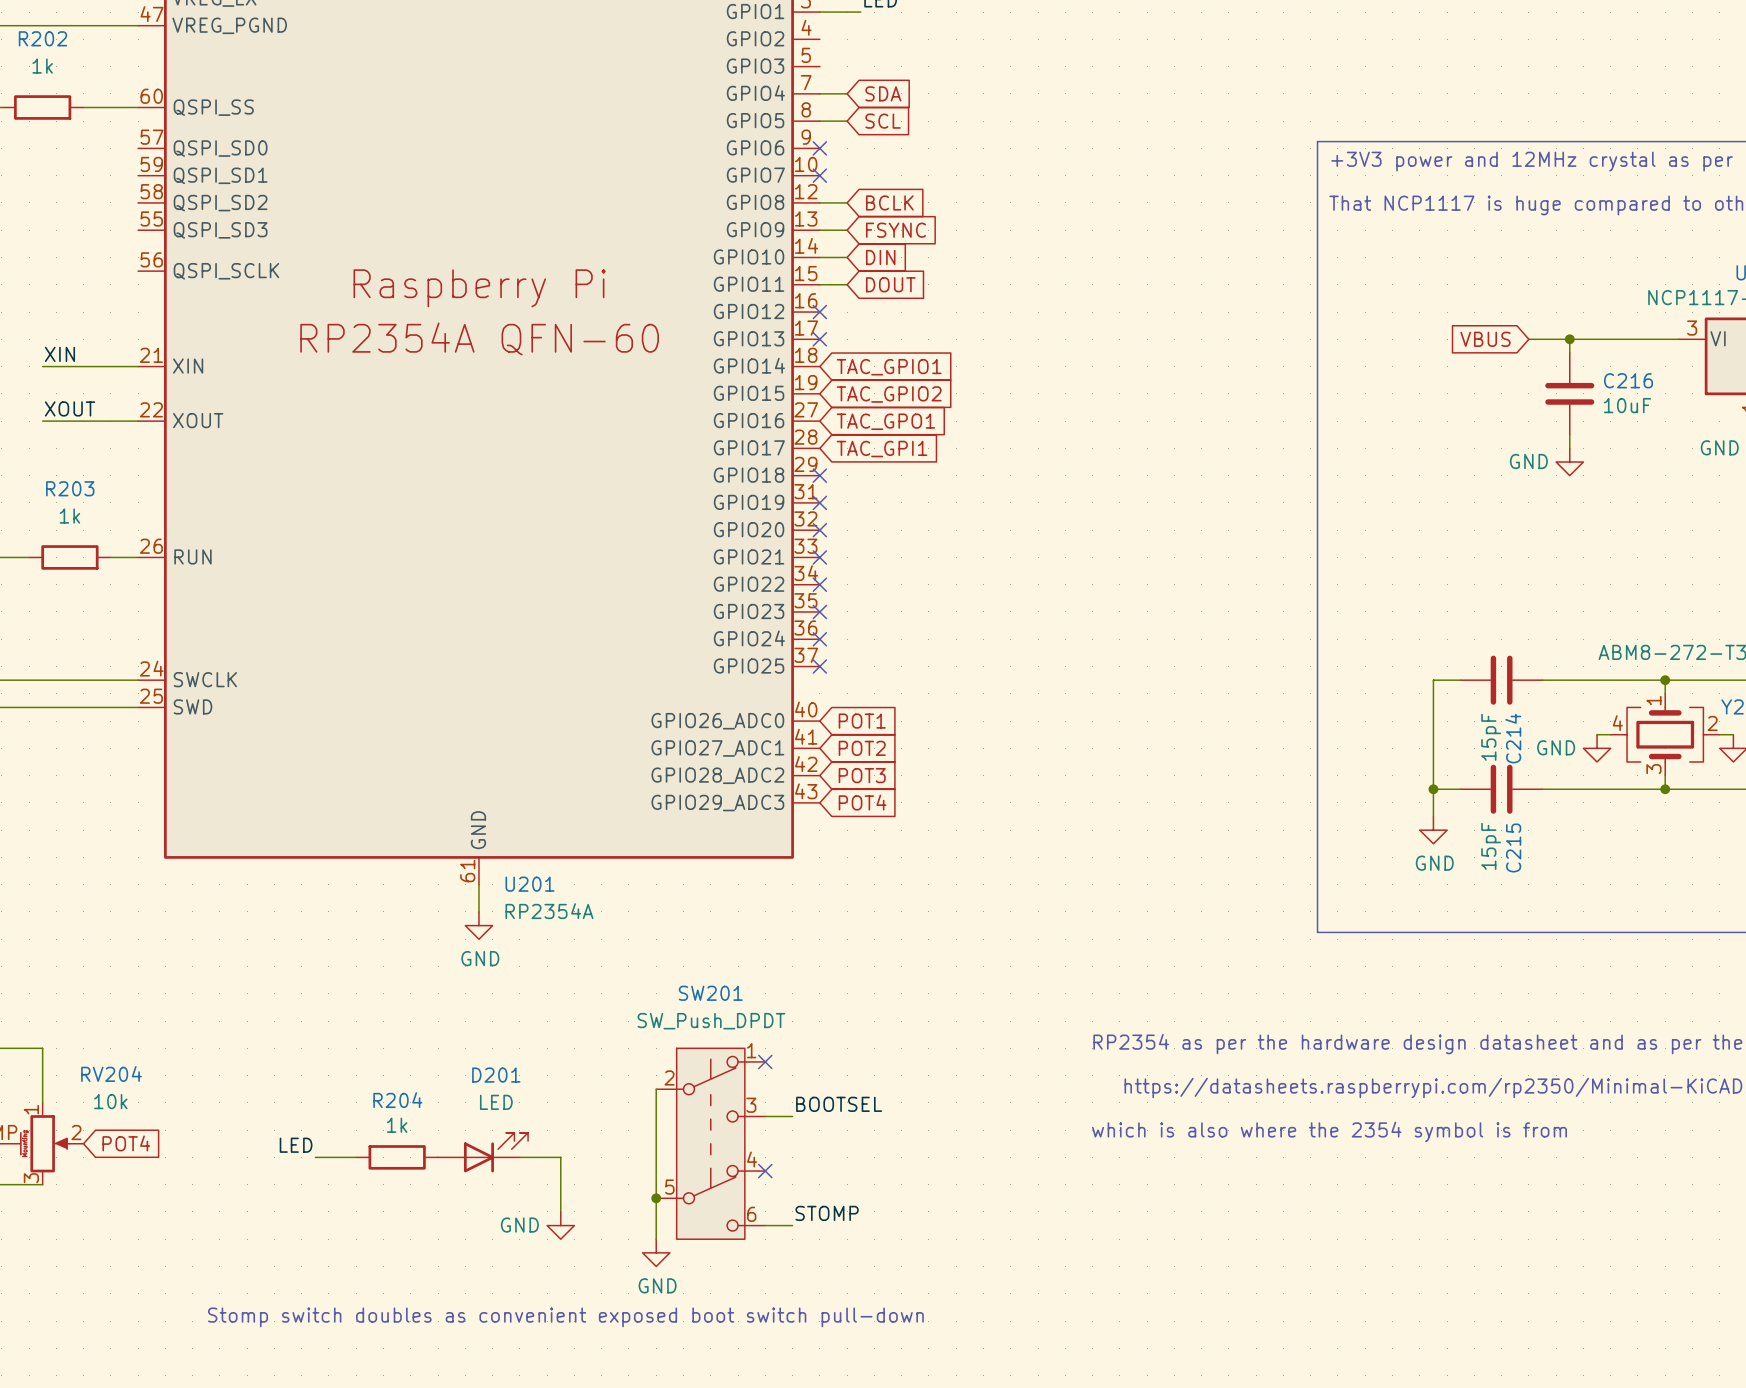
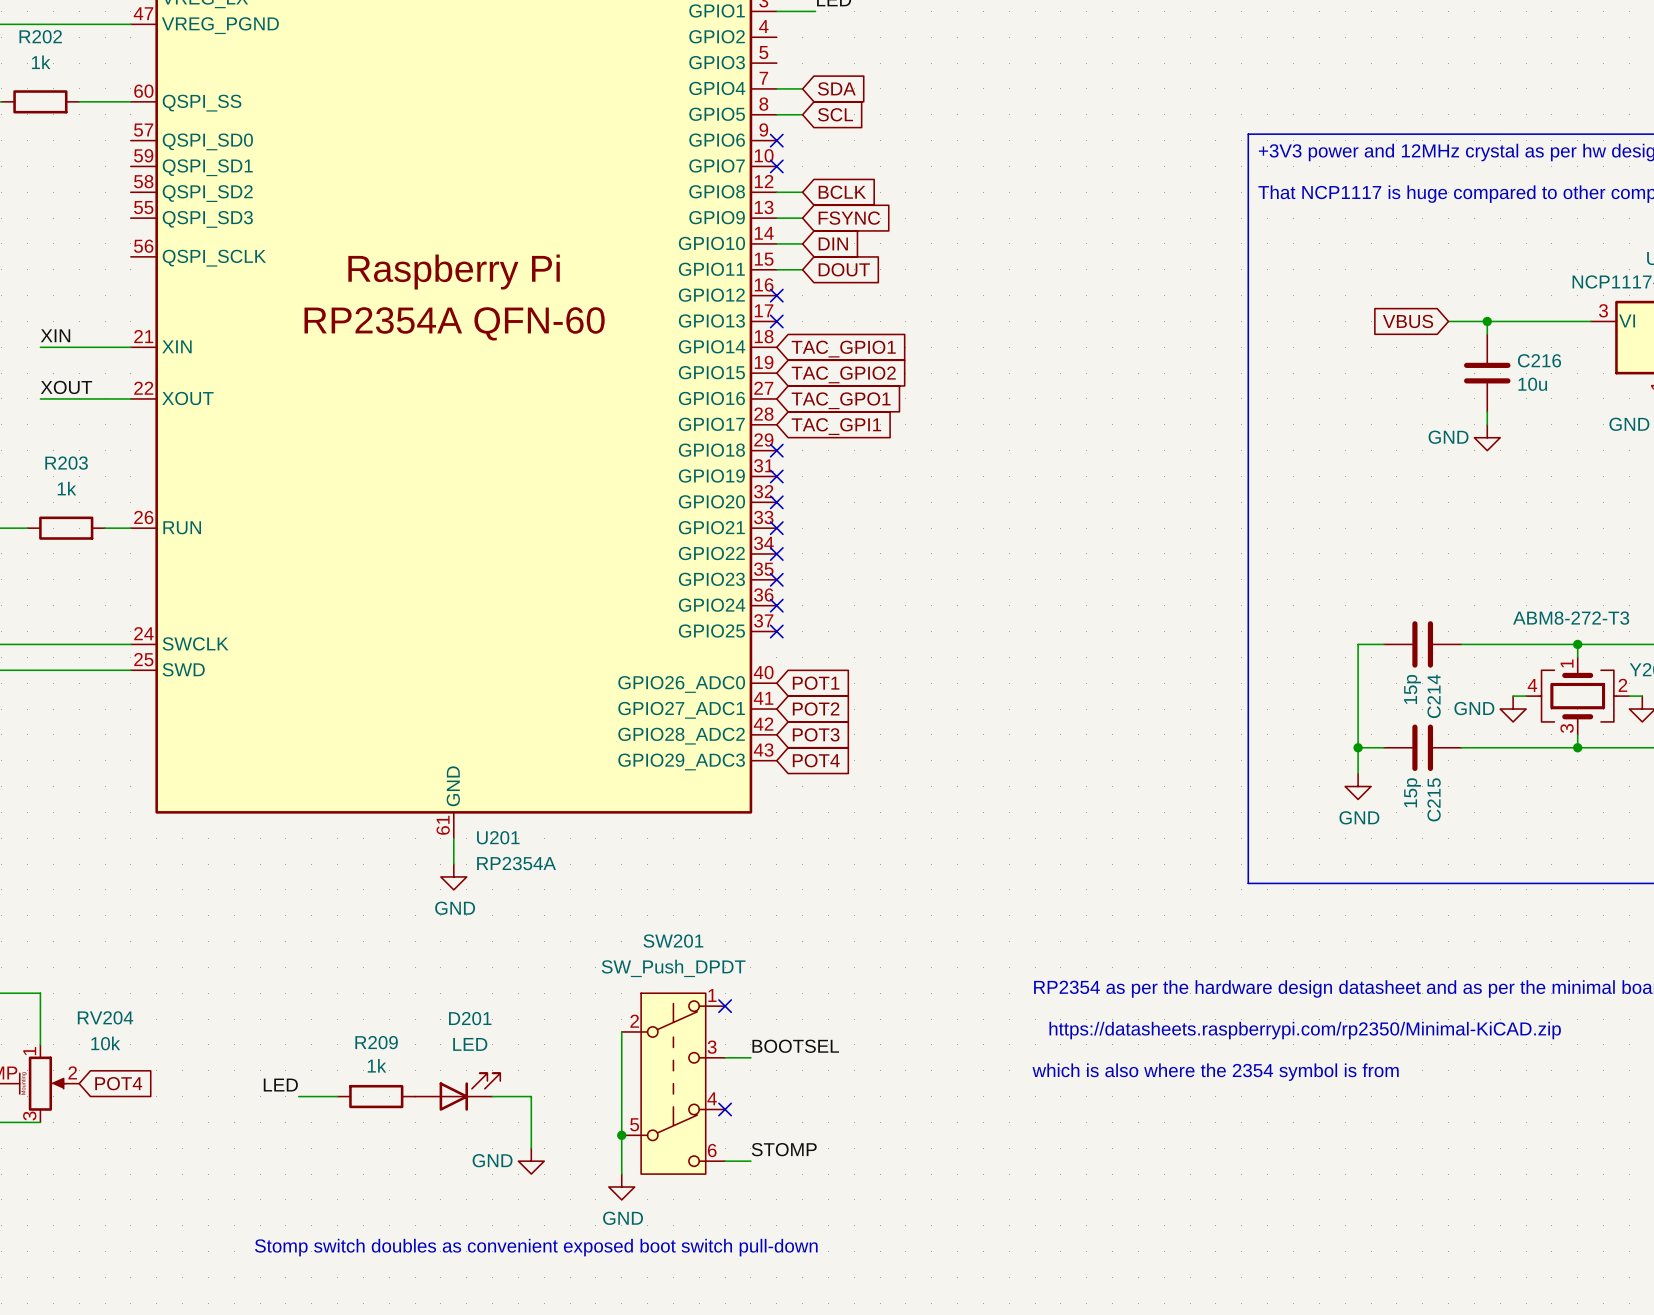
C216 value: 10uF (1627, 405) -> 10u (1532, 384)
C214 value: 15pF (1491, 737) -> 15p (1412, 689)
C215 value: 15pF (1491, 846) -> 15p (1412, 792)
R204 name: R204 (397, 1100) -> R209 (376, 1042)

